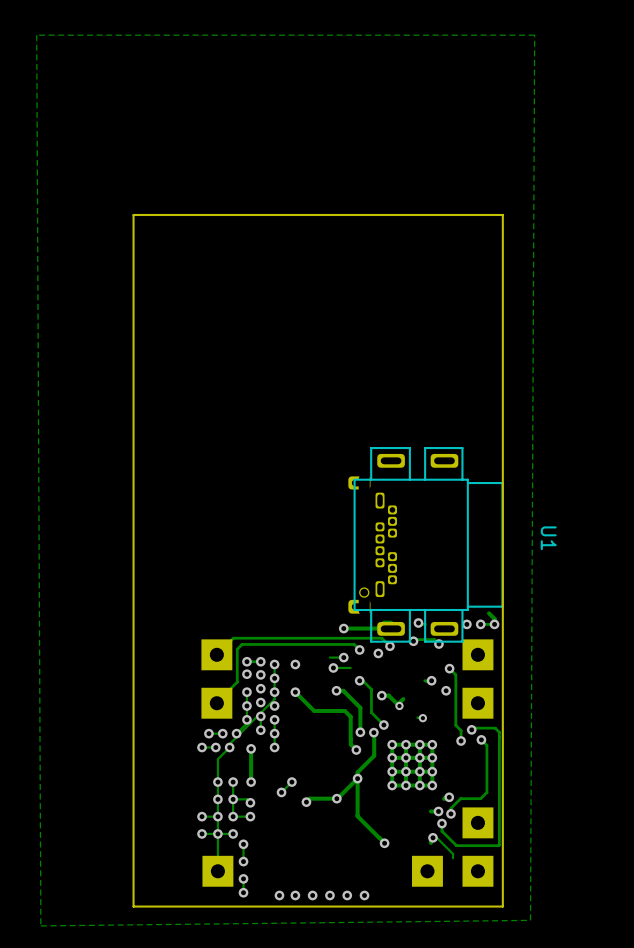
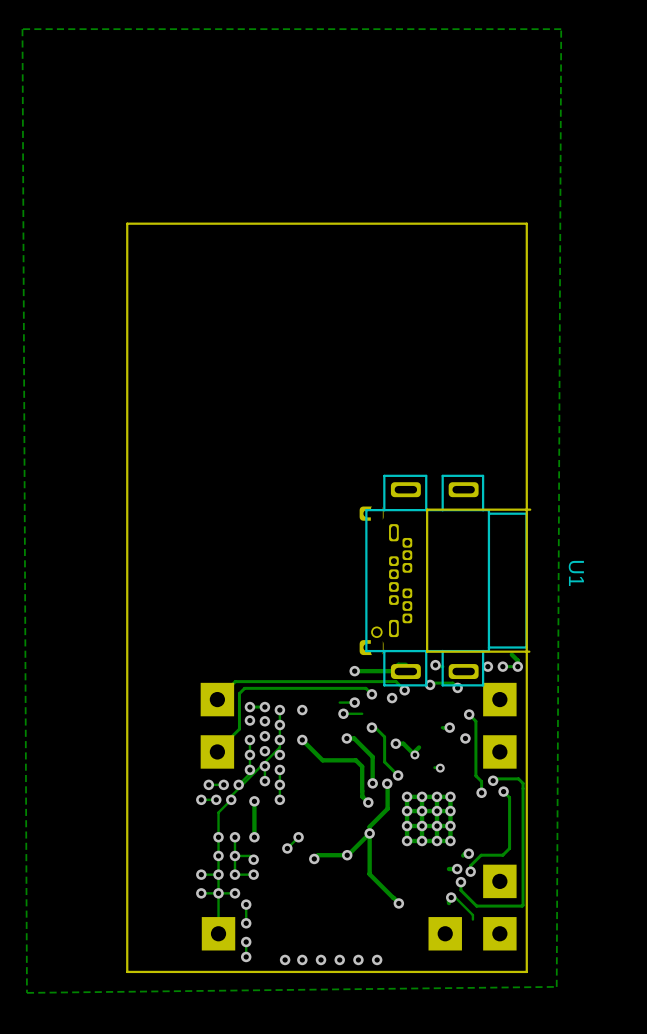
board edge: none -> (530, 509) (427, 509) (427, 651) (529, 651)

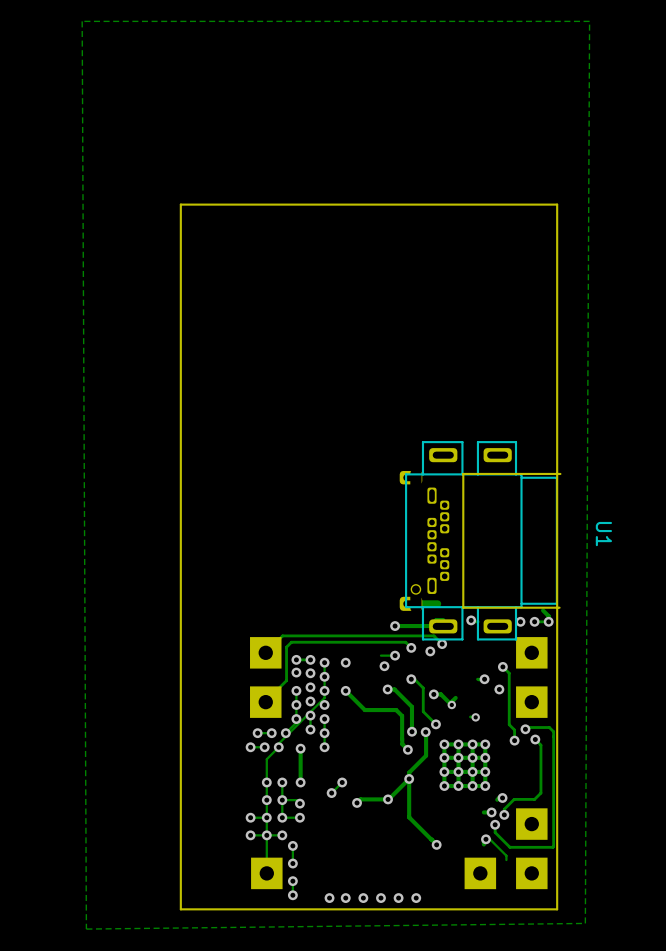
track: none -> (437, 603) (411, 603)
track: (430, 684) (431, 683) (452, 683) (457, 687) -> none
via: (430, 684) -> none
via: (457, 687) -> none
track: (362, 713) (343, 713) -> none

